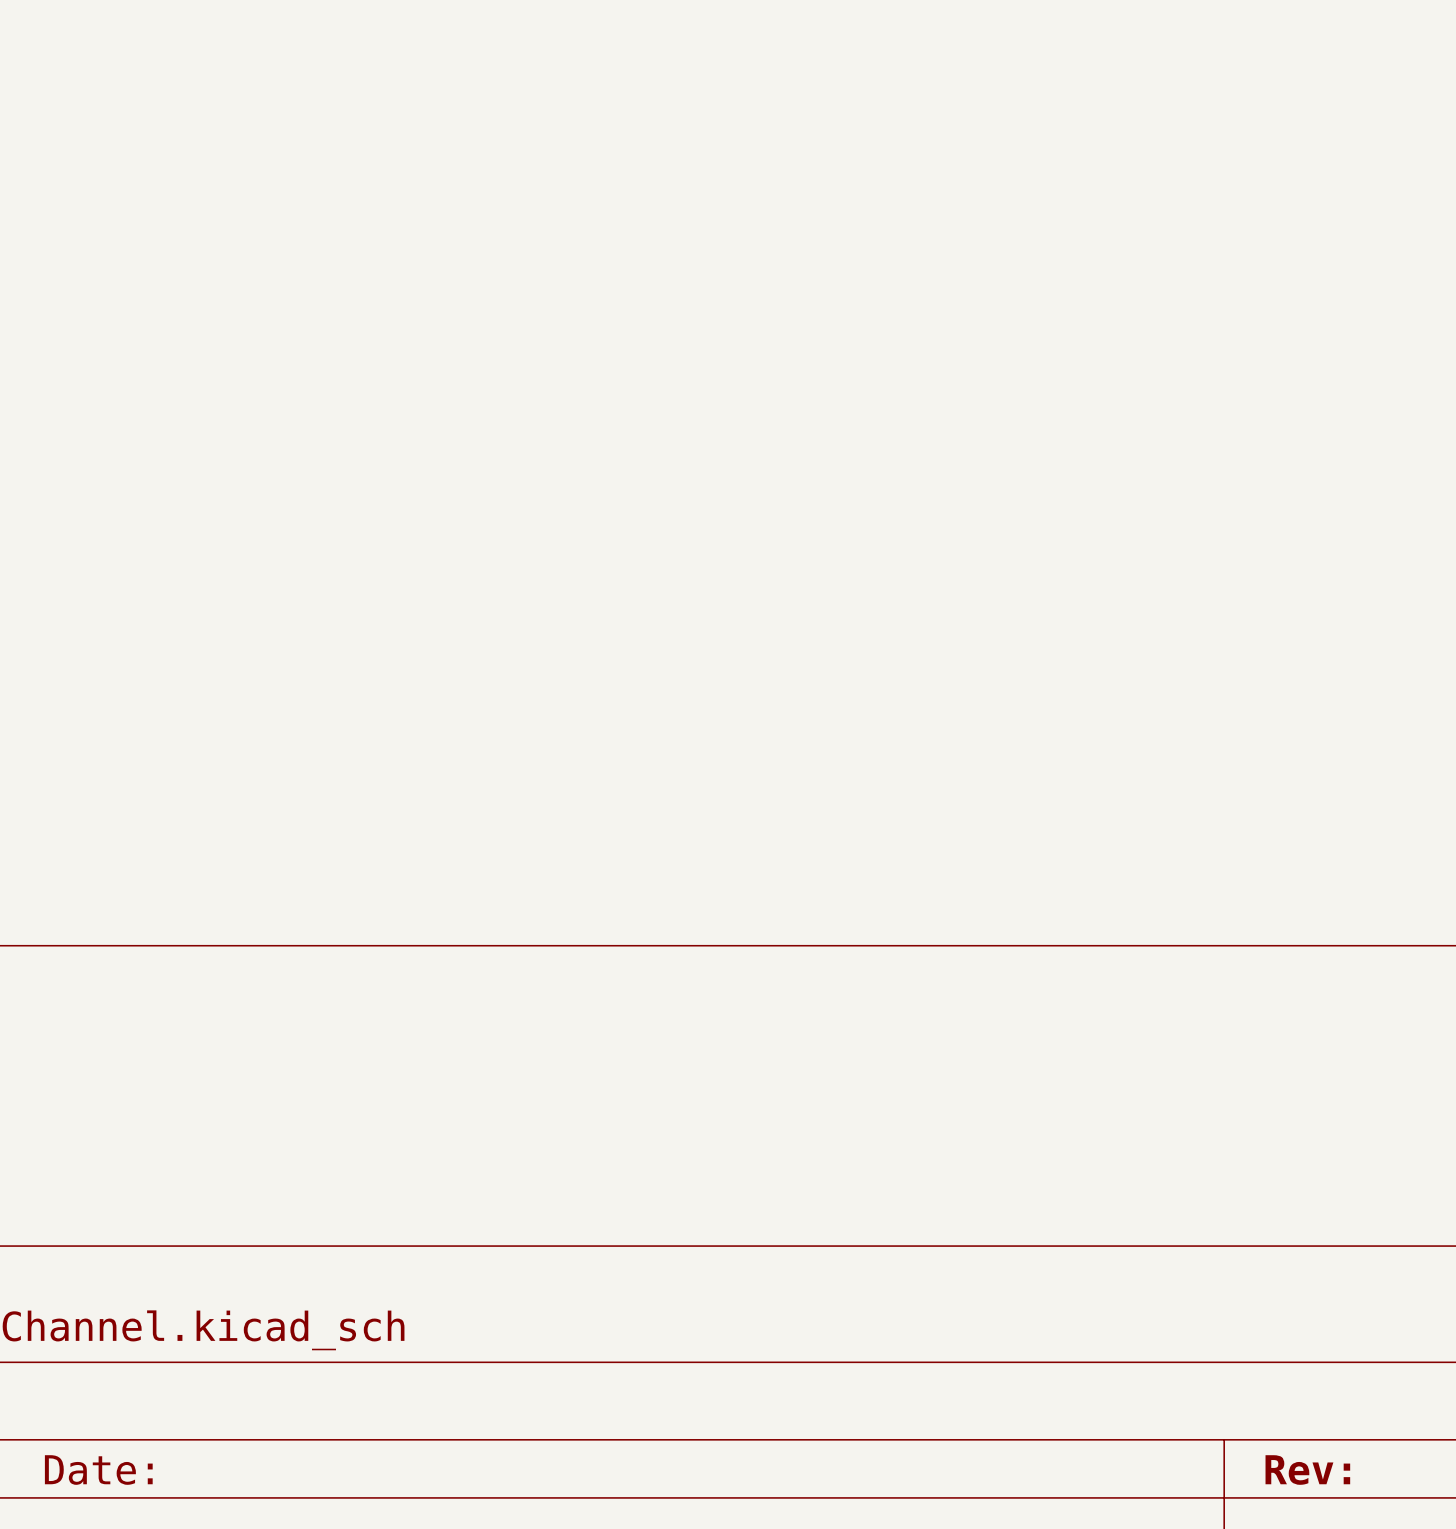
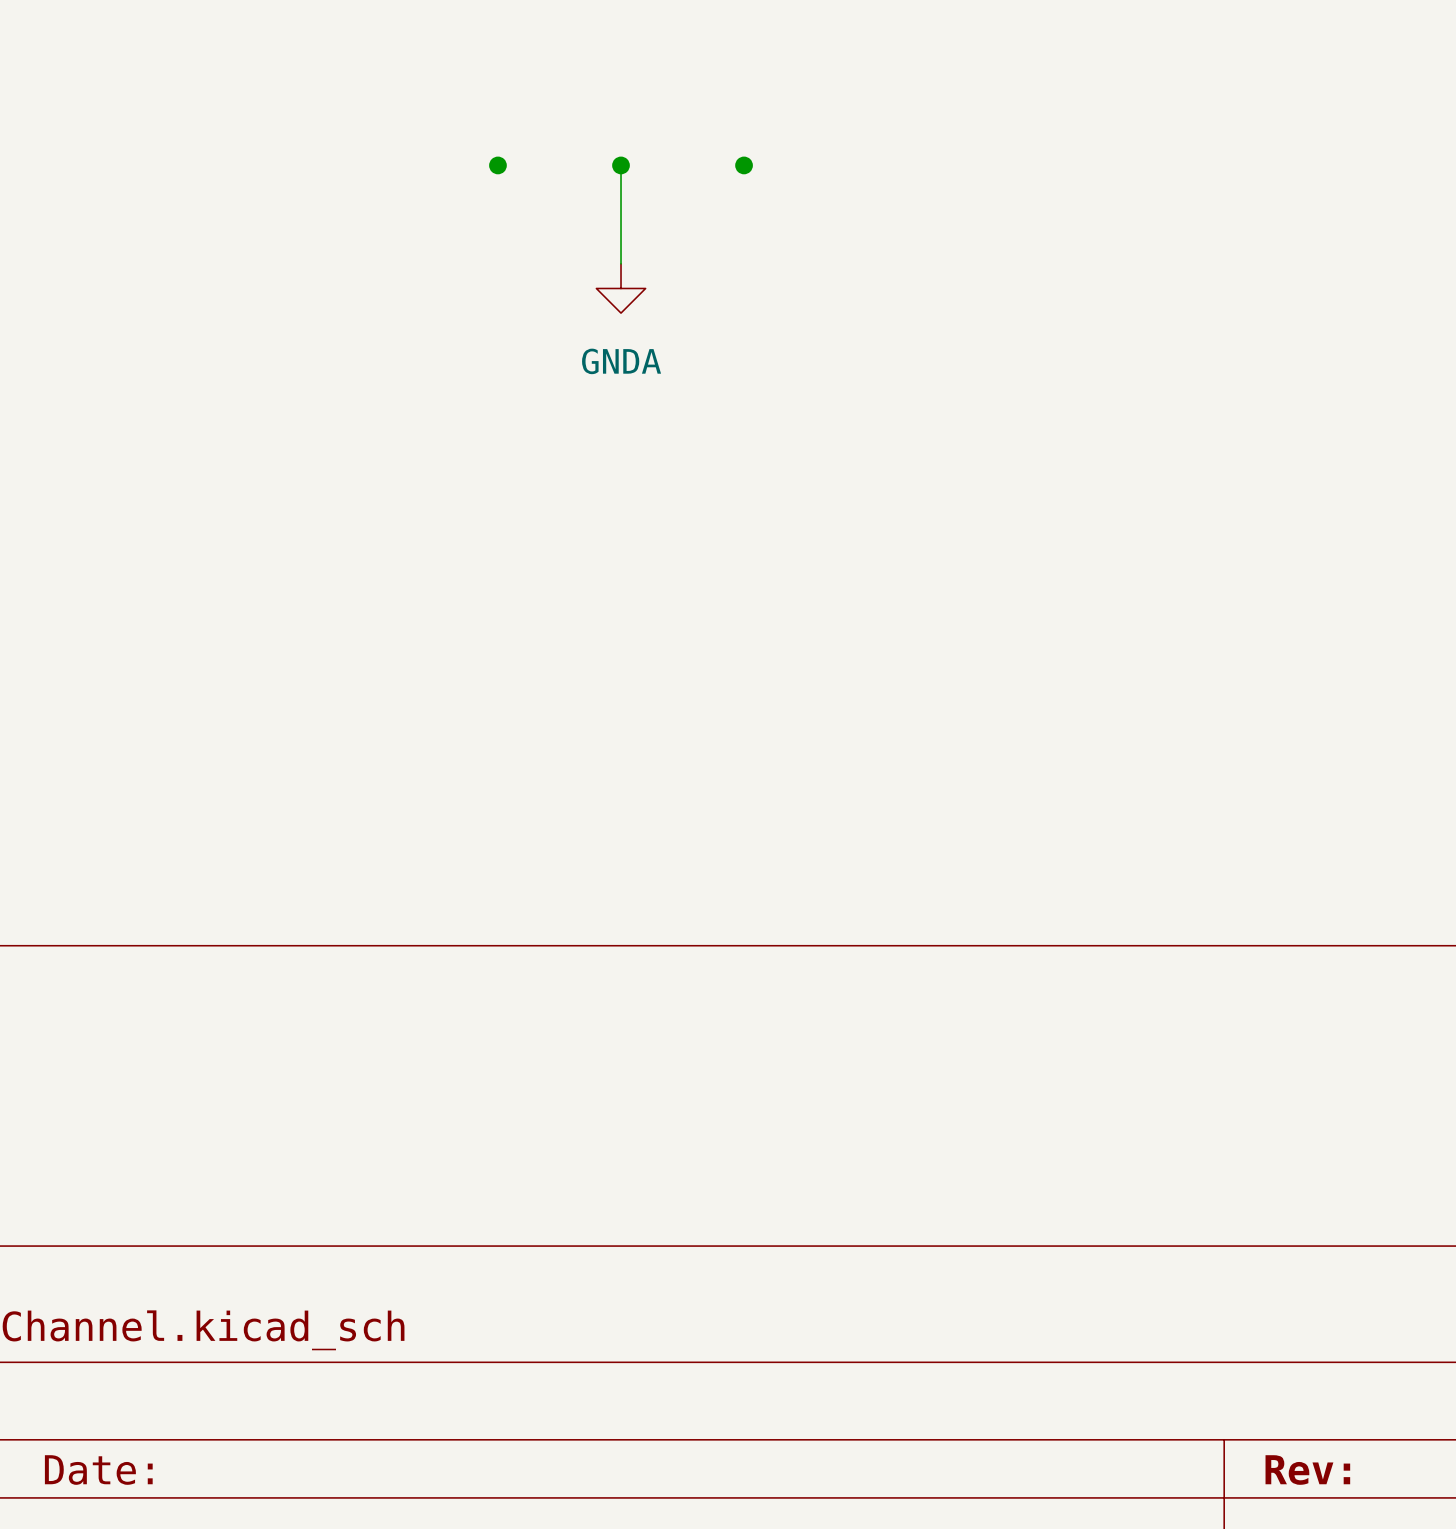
junction: none -> (497, 165)
wire: none -> (621, 165) (621, 263)
junction: none -> (621, 165)
junction: none -> (744, 165)
power symbol: none -> GNDA (621, 288)

